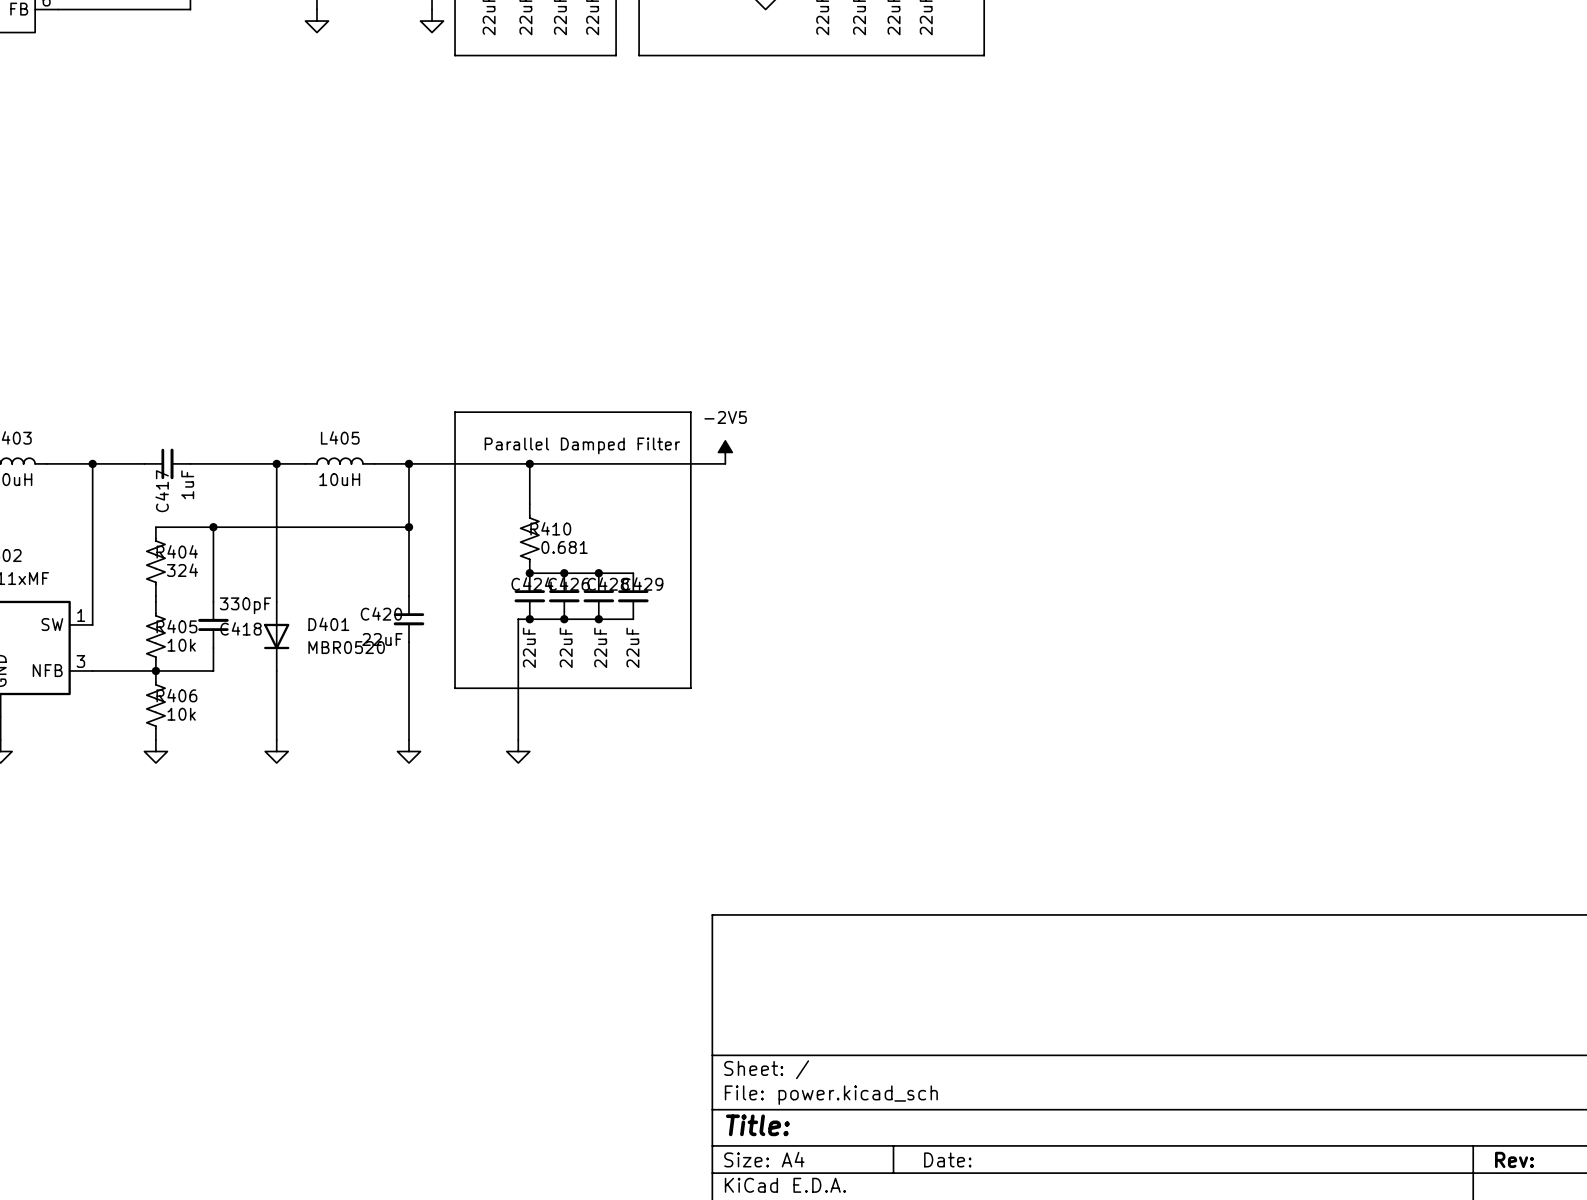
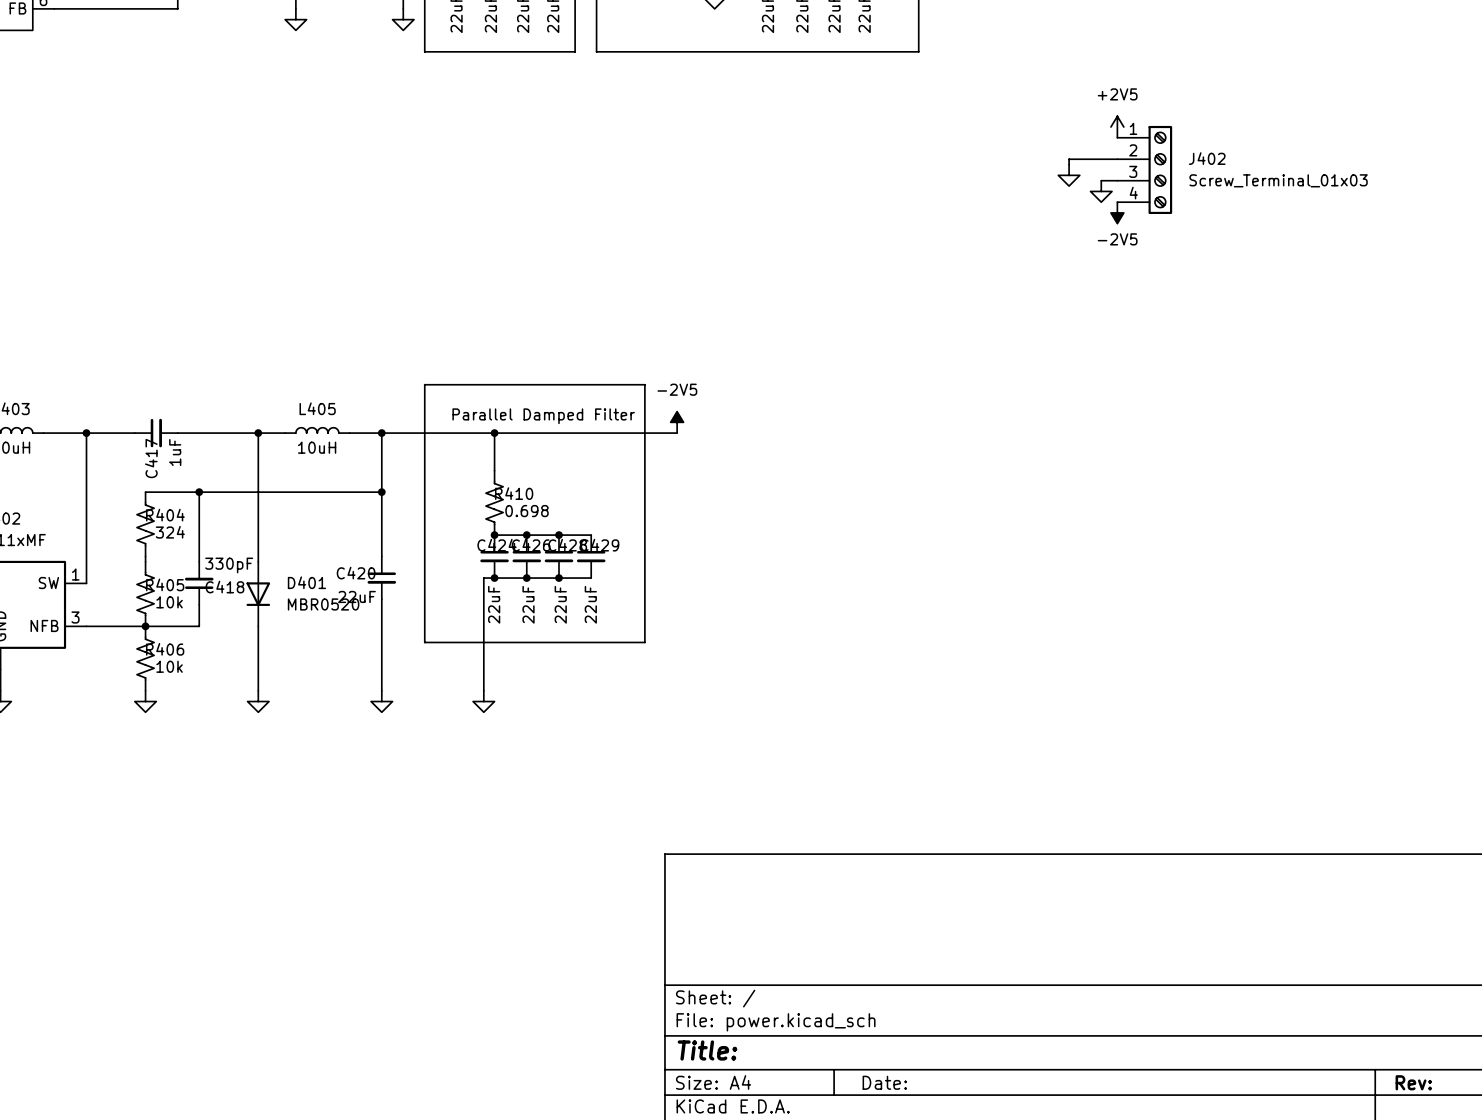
power symbol: none -> +2V5 (1117, 127)
wire: none -> (1117, 159) (1069, 159) (1069, 164)
J402: none -> Screw_Terminal_01x03 (1144, 169)
power symbol: none -> (1069, 175)
wire: none -> (1101, 180) (1117, 180)
power symbol: none -> (1101, 191)
power symbol: none -> -2V5 (1117, 212)
R410 value: 0.681 (564, 547) -> 0.698 (527, 511)

